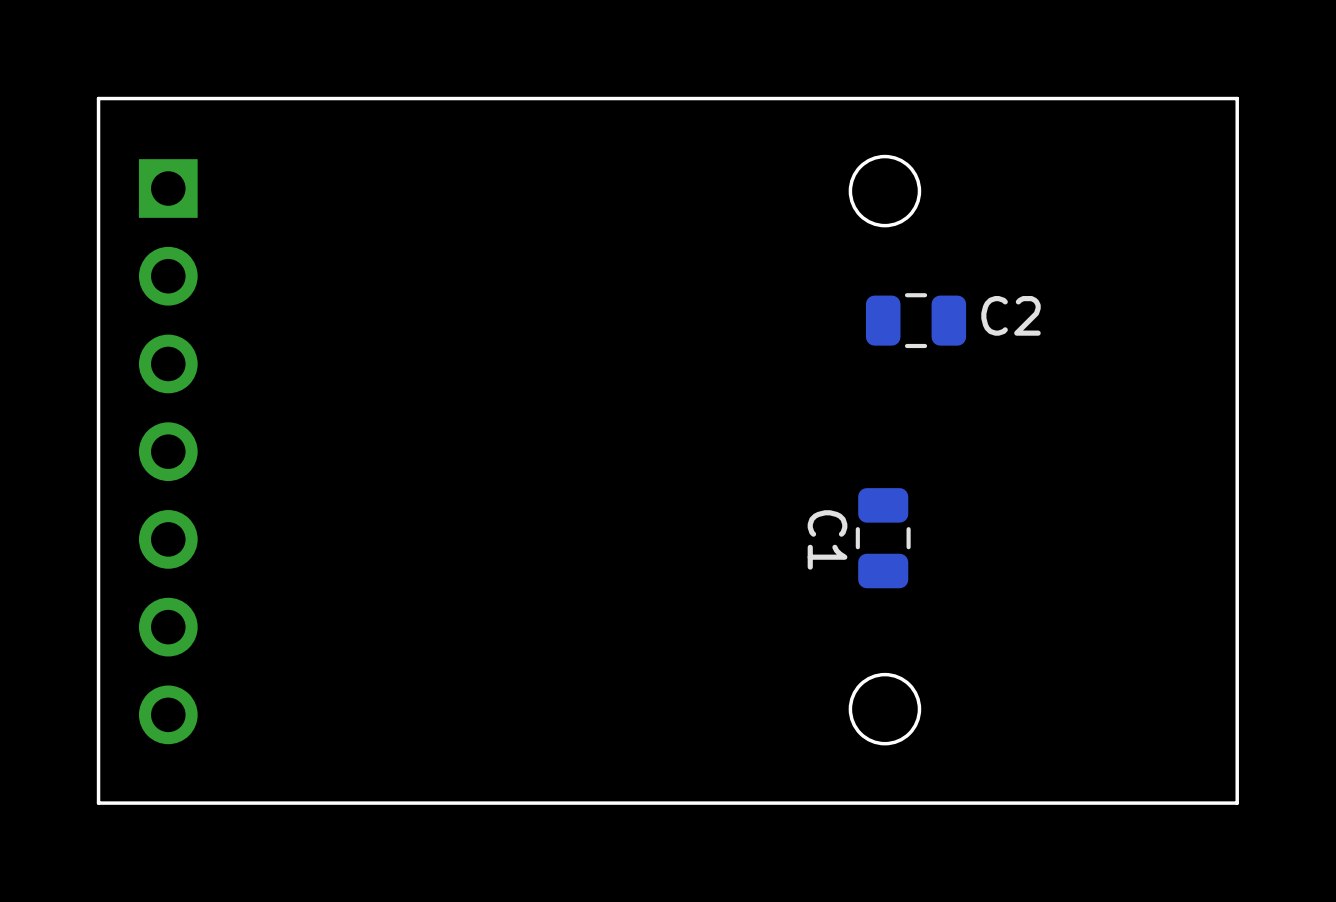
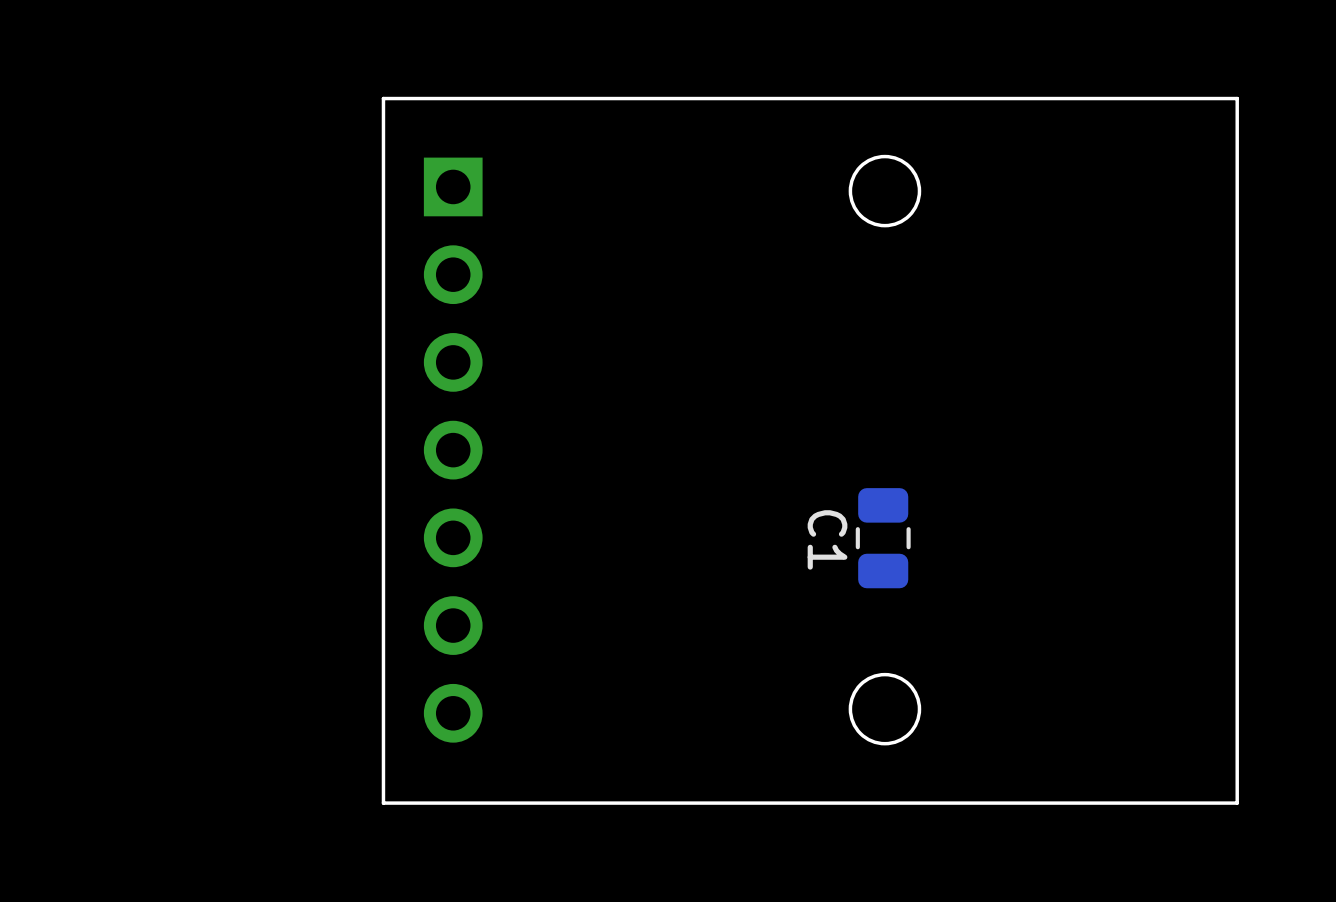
board edge: (383, 98) (98, 98) (98, 803) (383, 803) -> (383, 98) (383, 803)
C2: (916, 320) -> none
part position: (168, 451) -> (453, 450)

